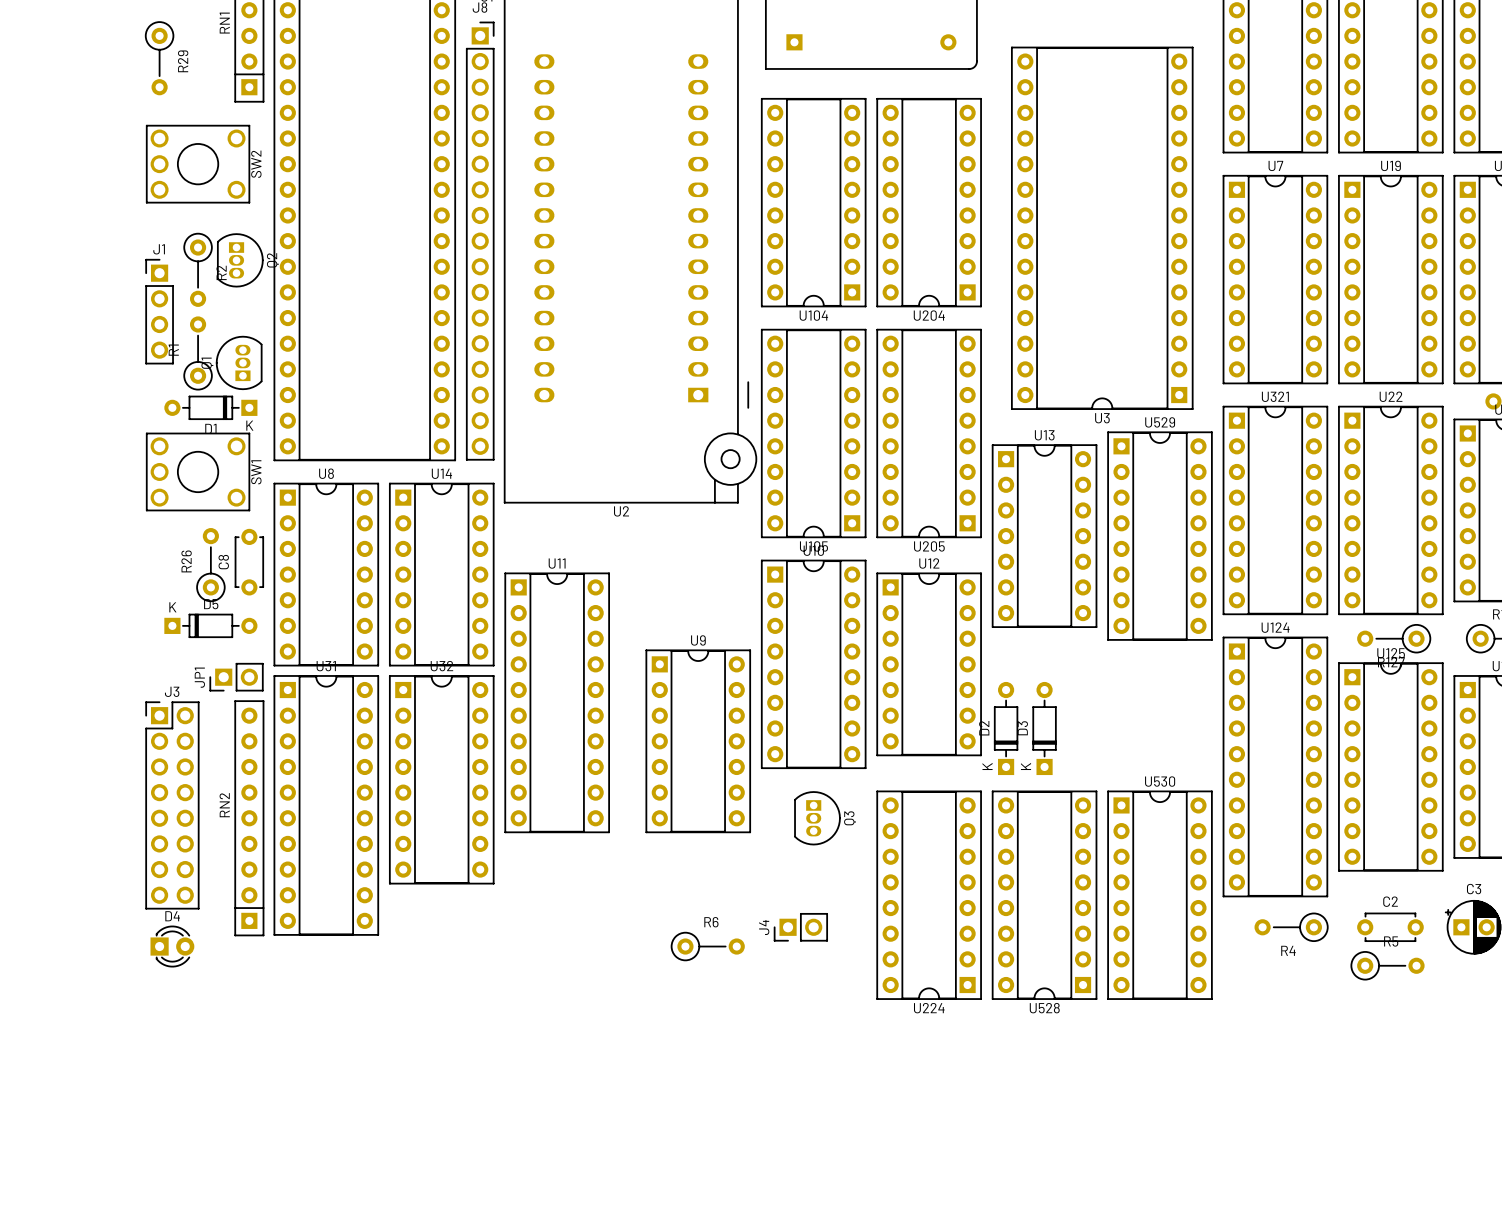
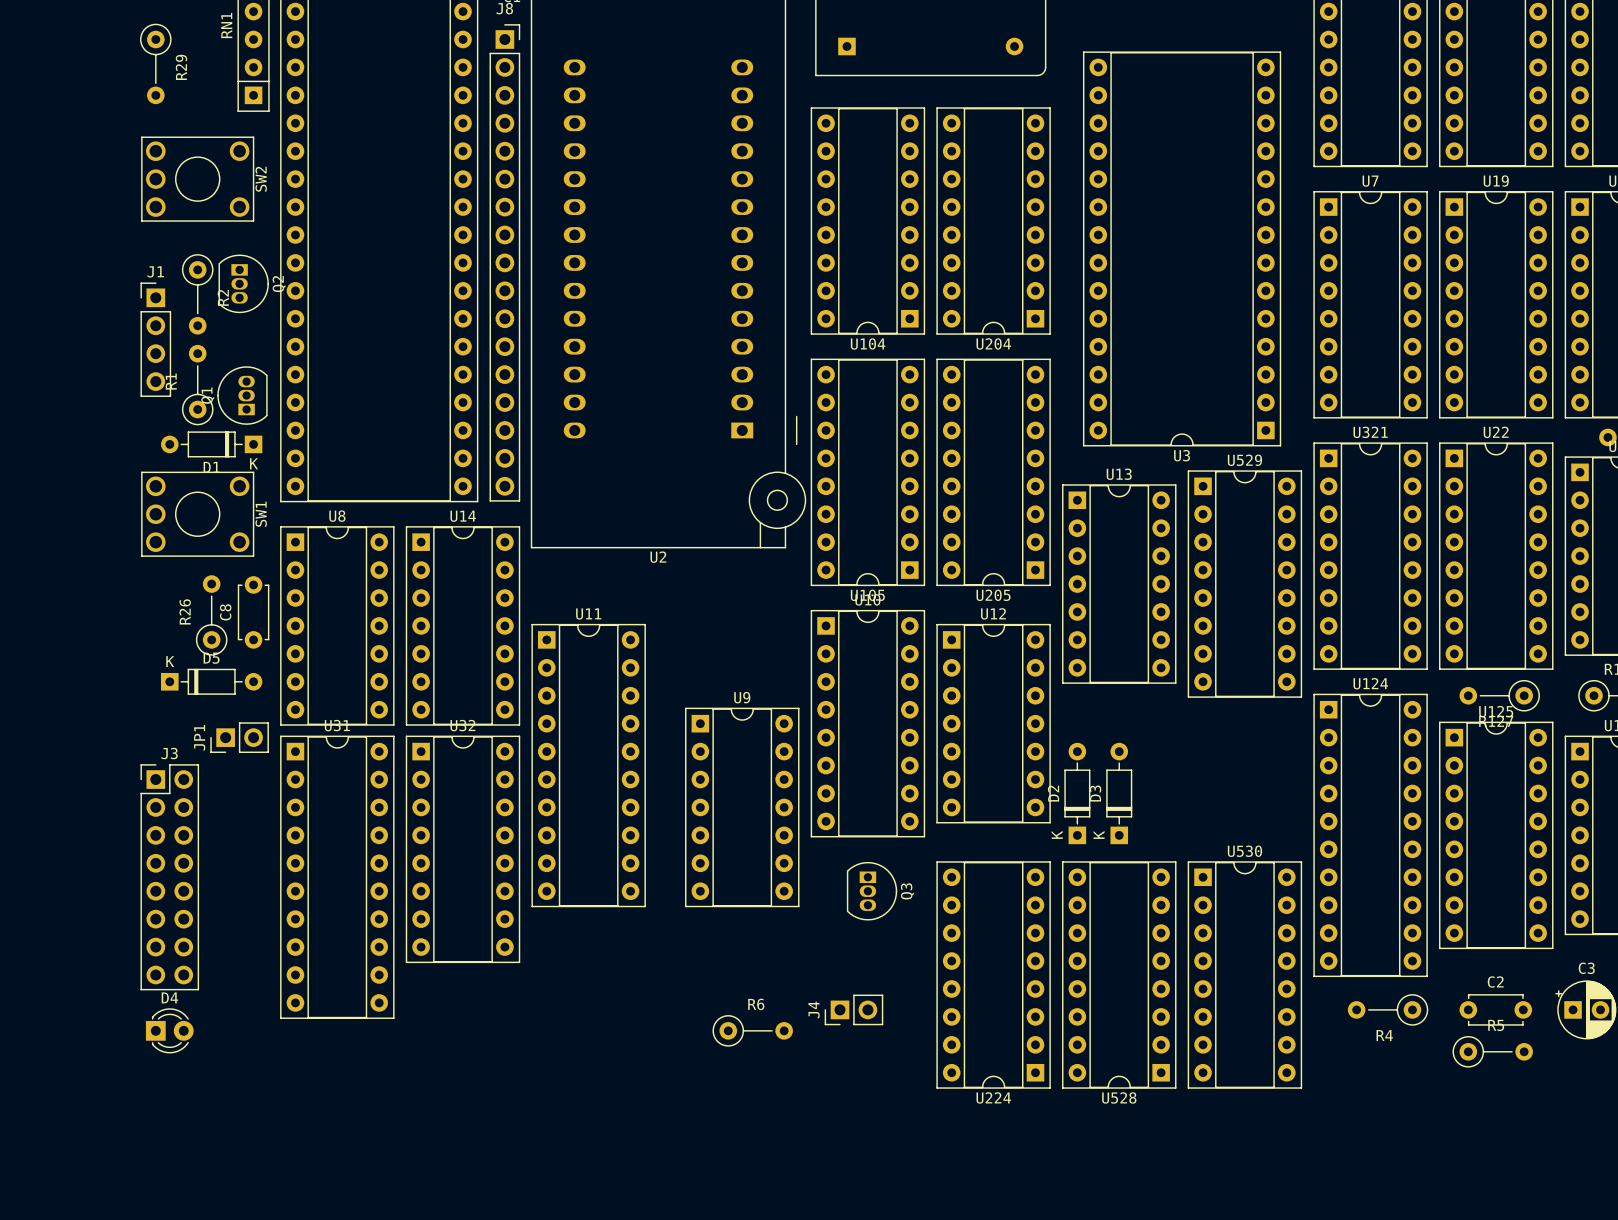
RN2: (249, 818) -> none

